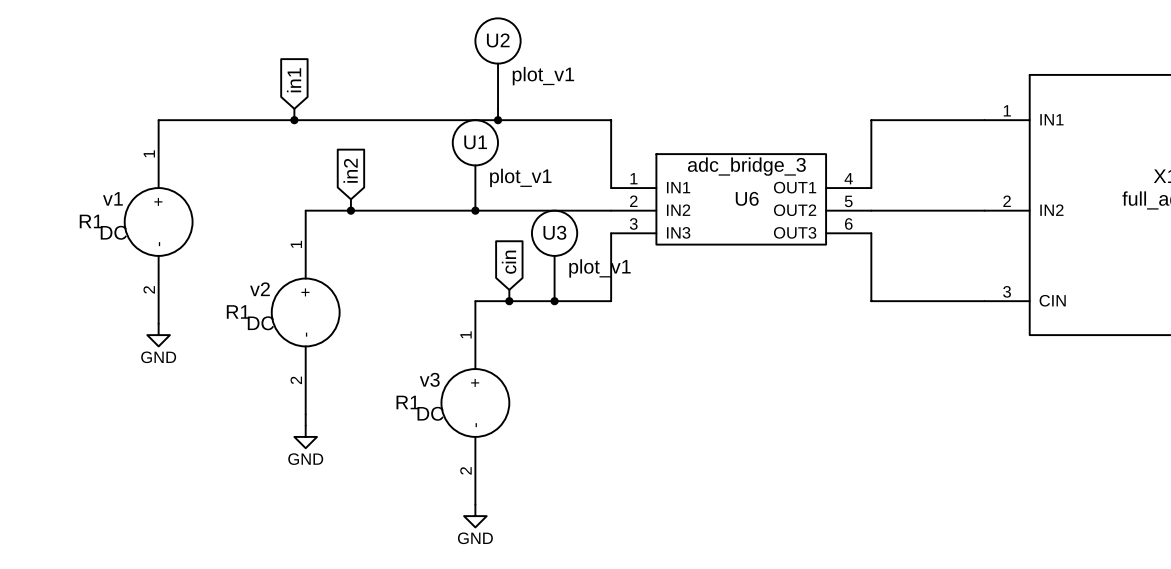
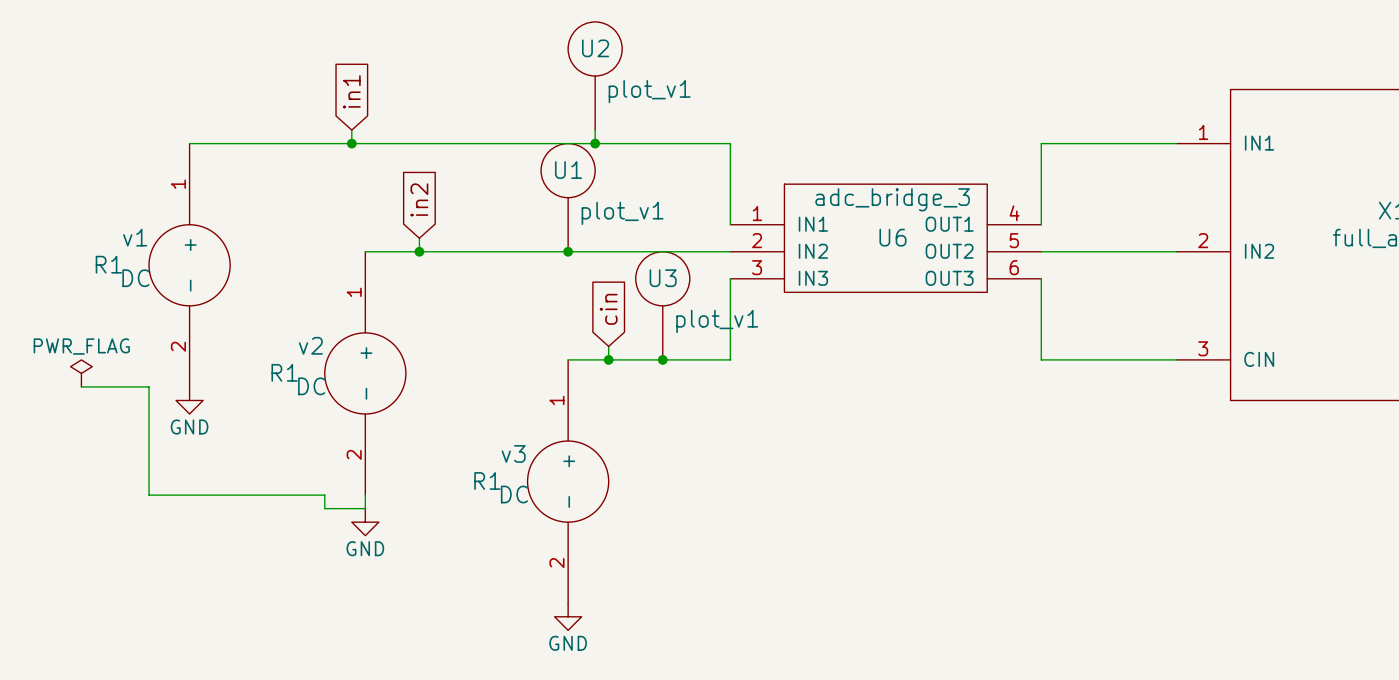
power symbol: none -> PWR_FLAG (81, 373)
wire: none -> (81, 386) (149, 386) (149, 495) (324, 495) (324, 508) (365, 508)

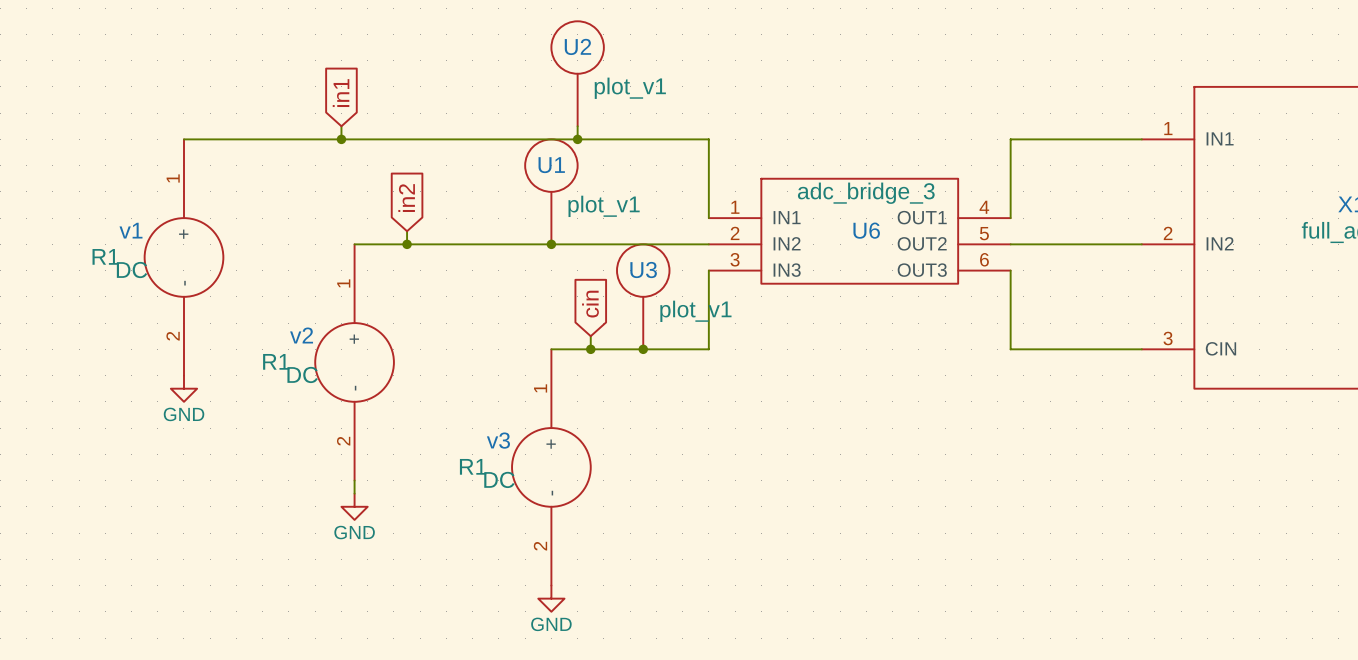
power symbol: PWR_FLAG (81, 373) -> none
wire: (81, 386) (149, 386) (149, 495) (324, 495) (324, 508) (365, 508) -> none

